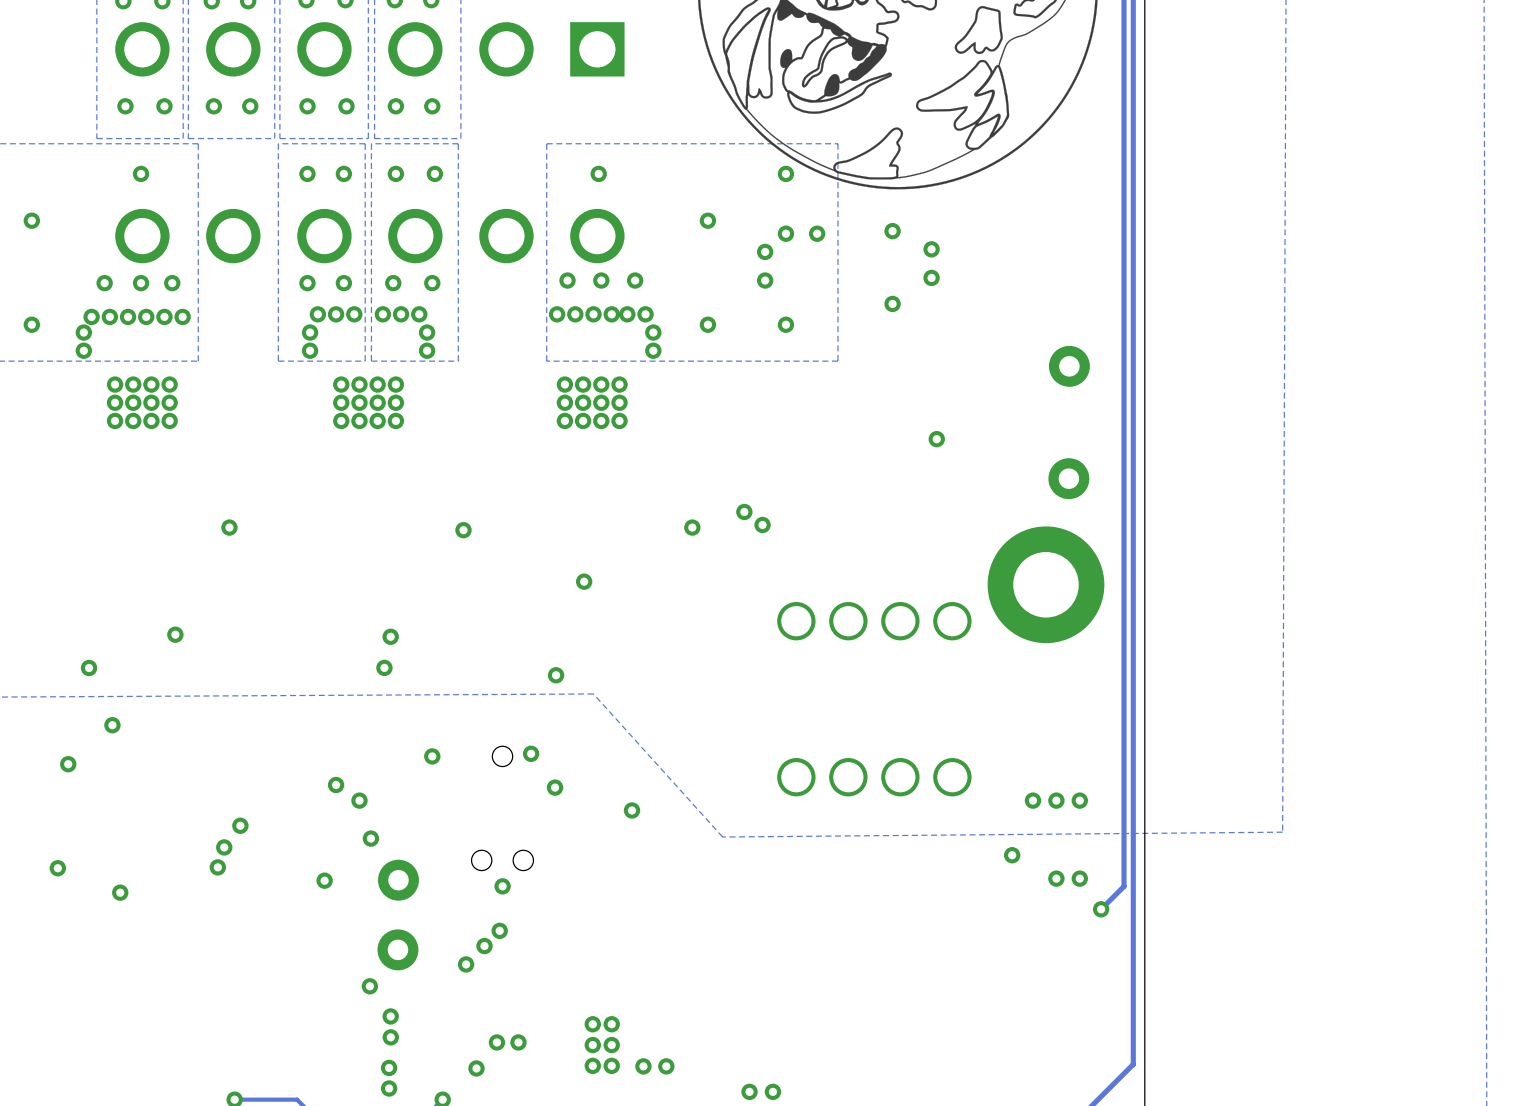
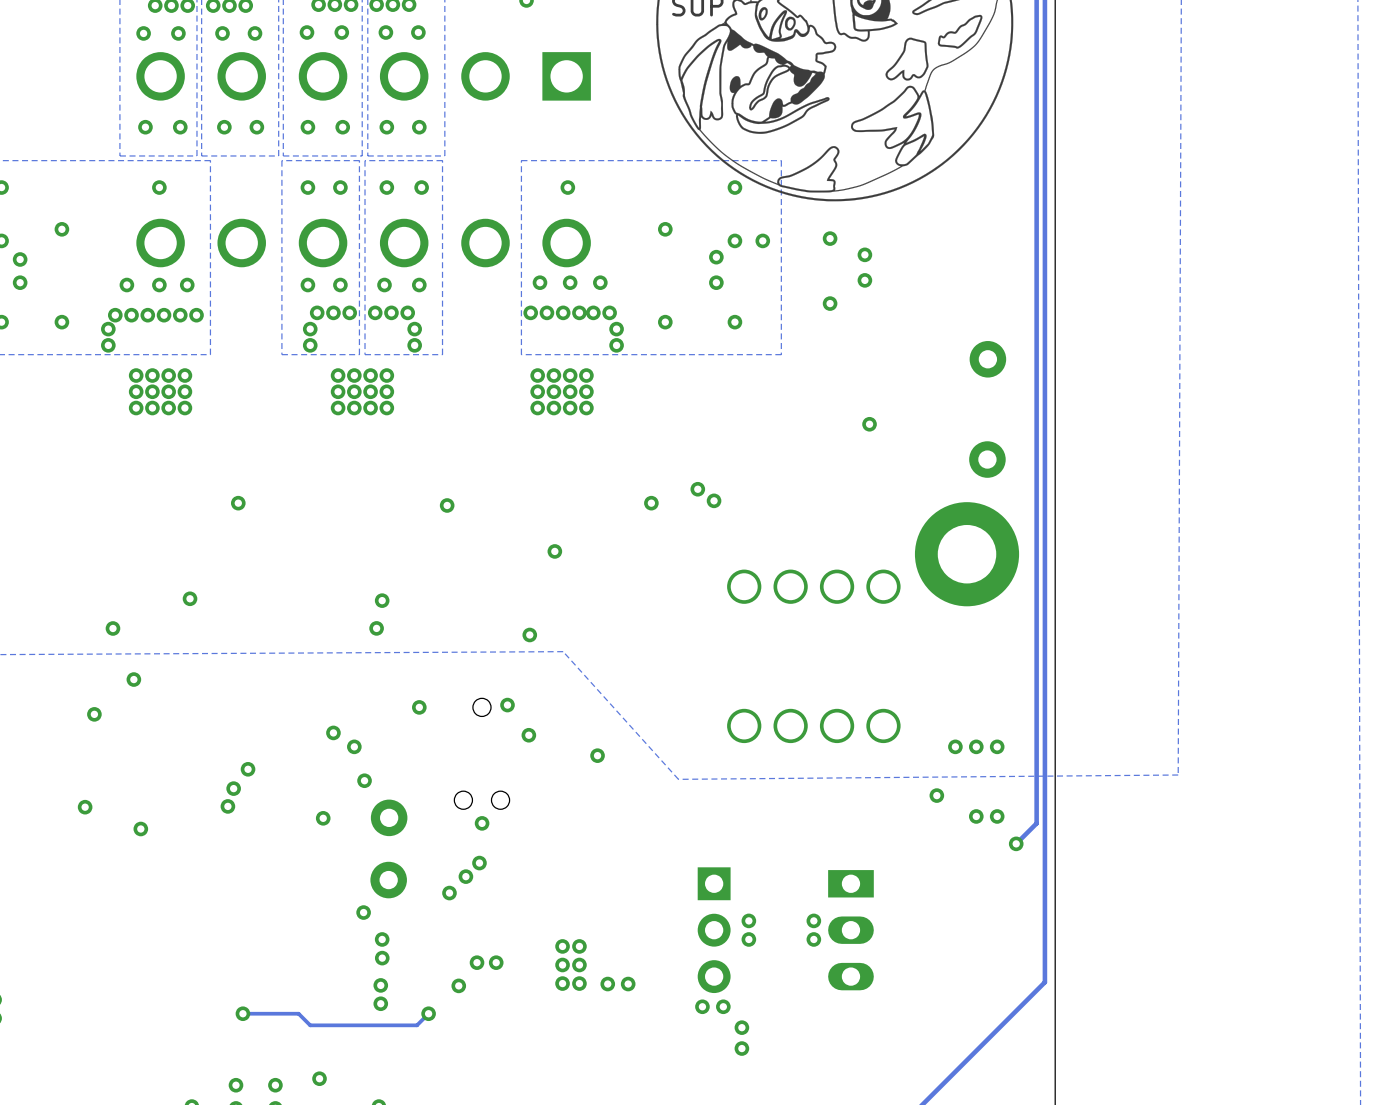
via: none -> (748, 920)
via: none -> (813, 920)
part: none -> (714, 930)
part: none -> (850, 930)
via: none -> (748, 939)
via: none -> (813, 939)

